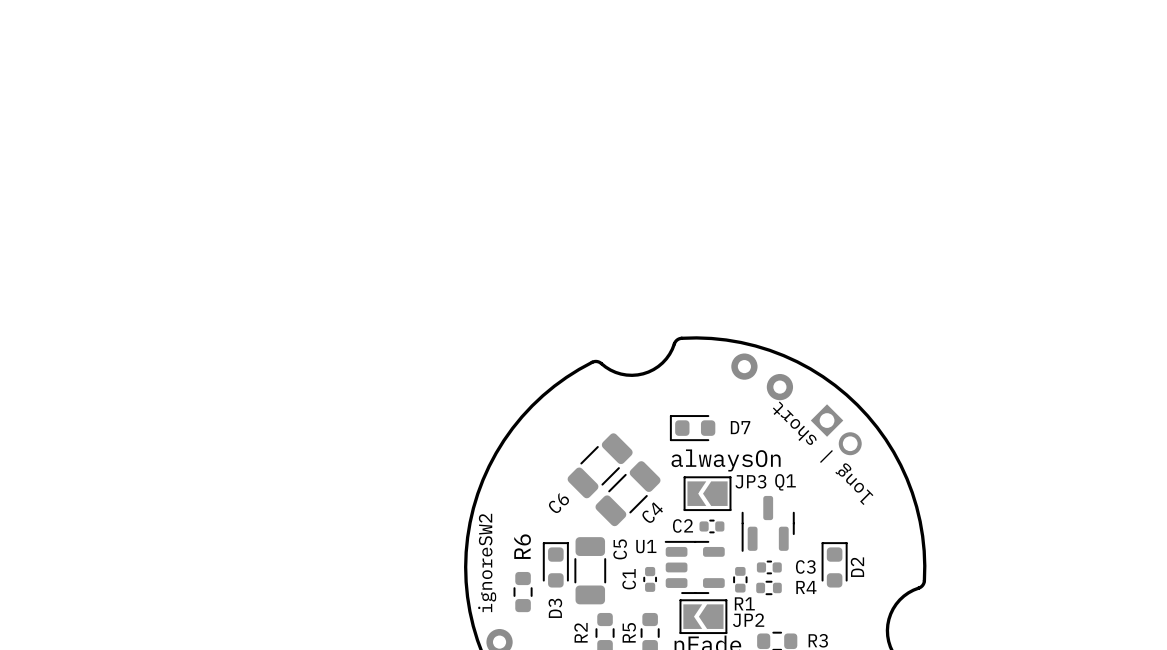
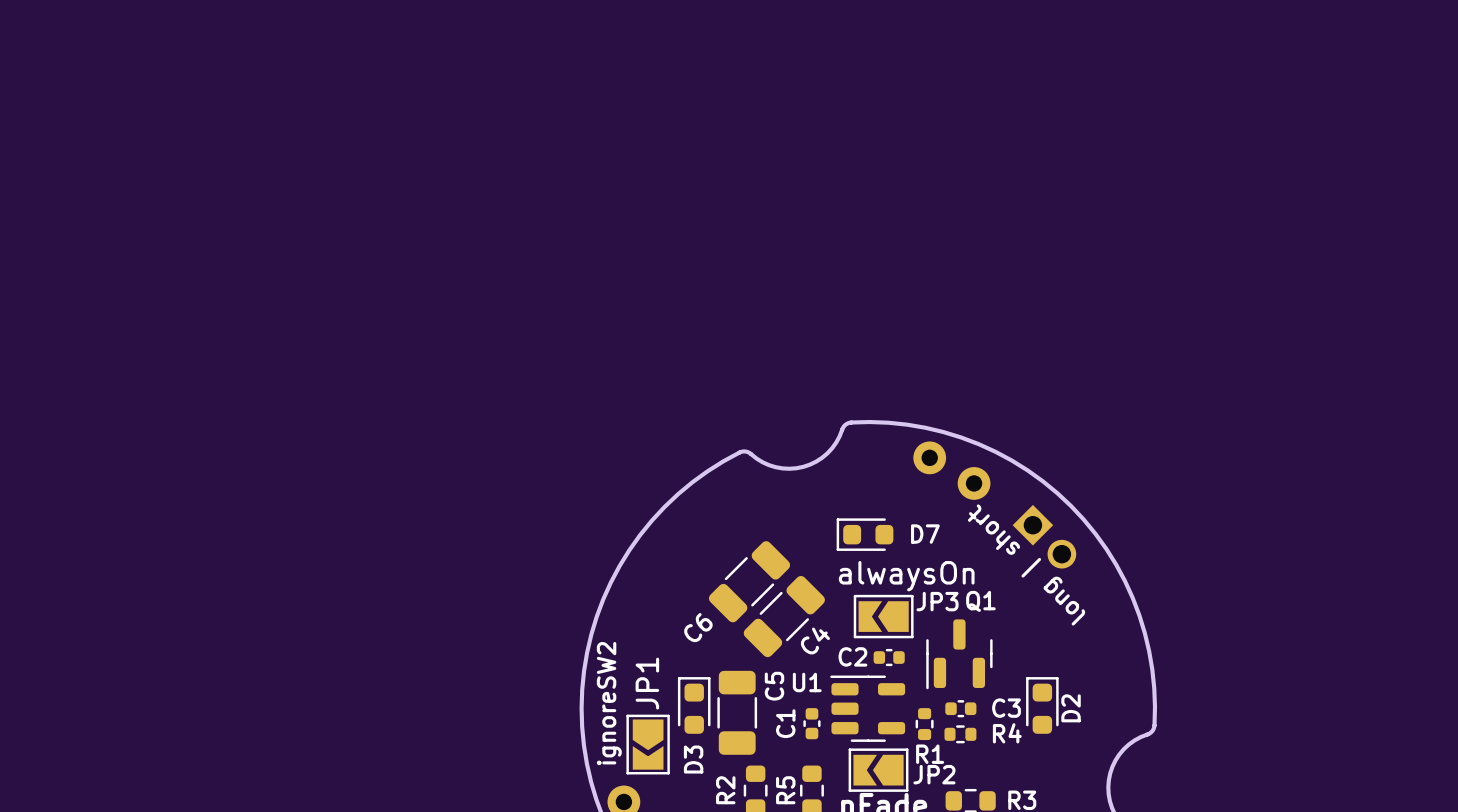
R6: (523, 592) -> none
JP1: none -> (648, 744)

